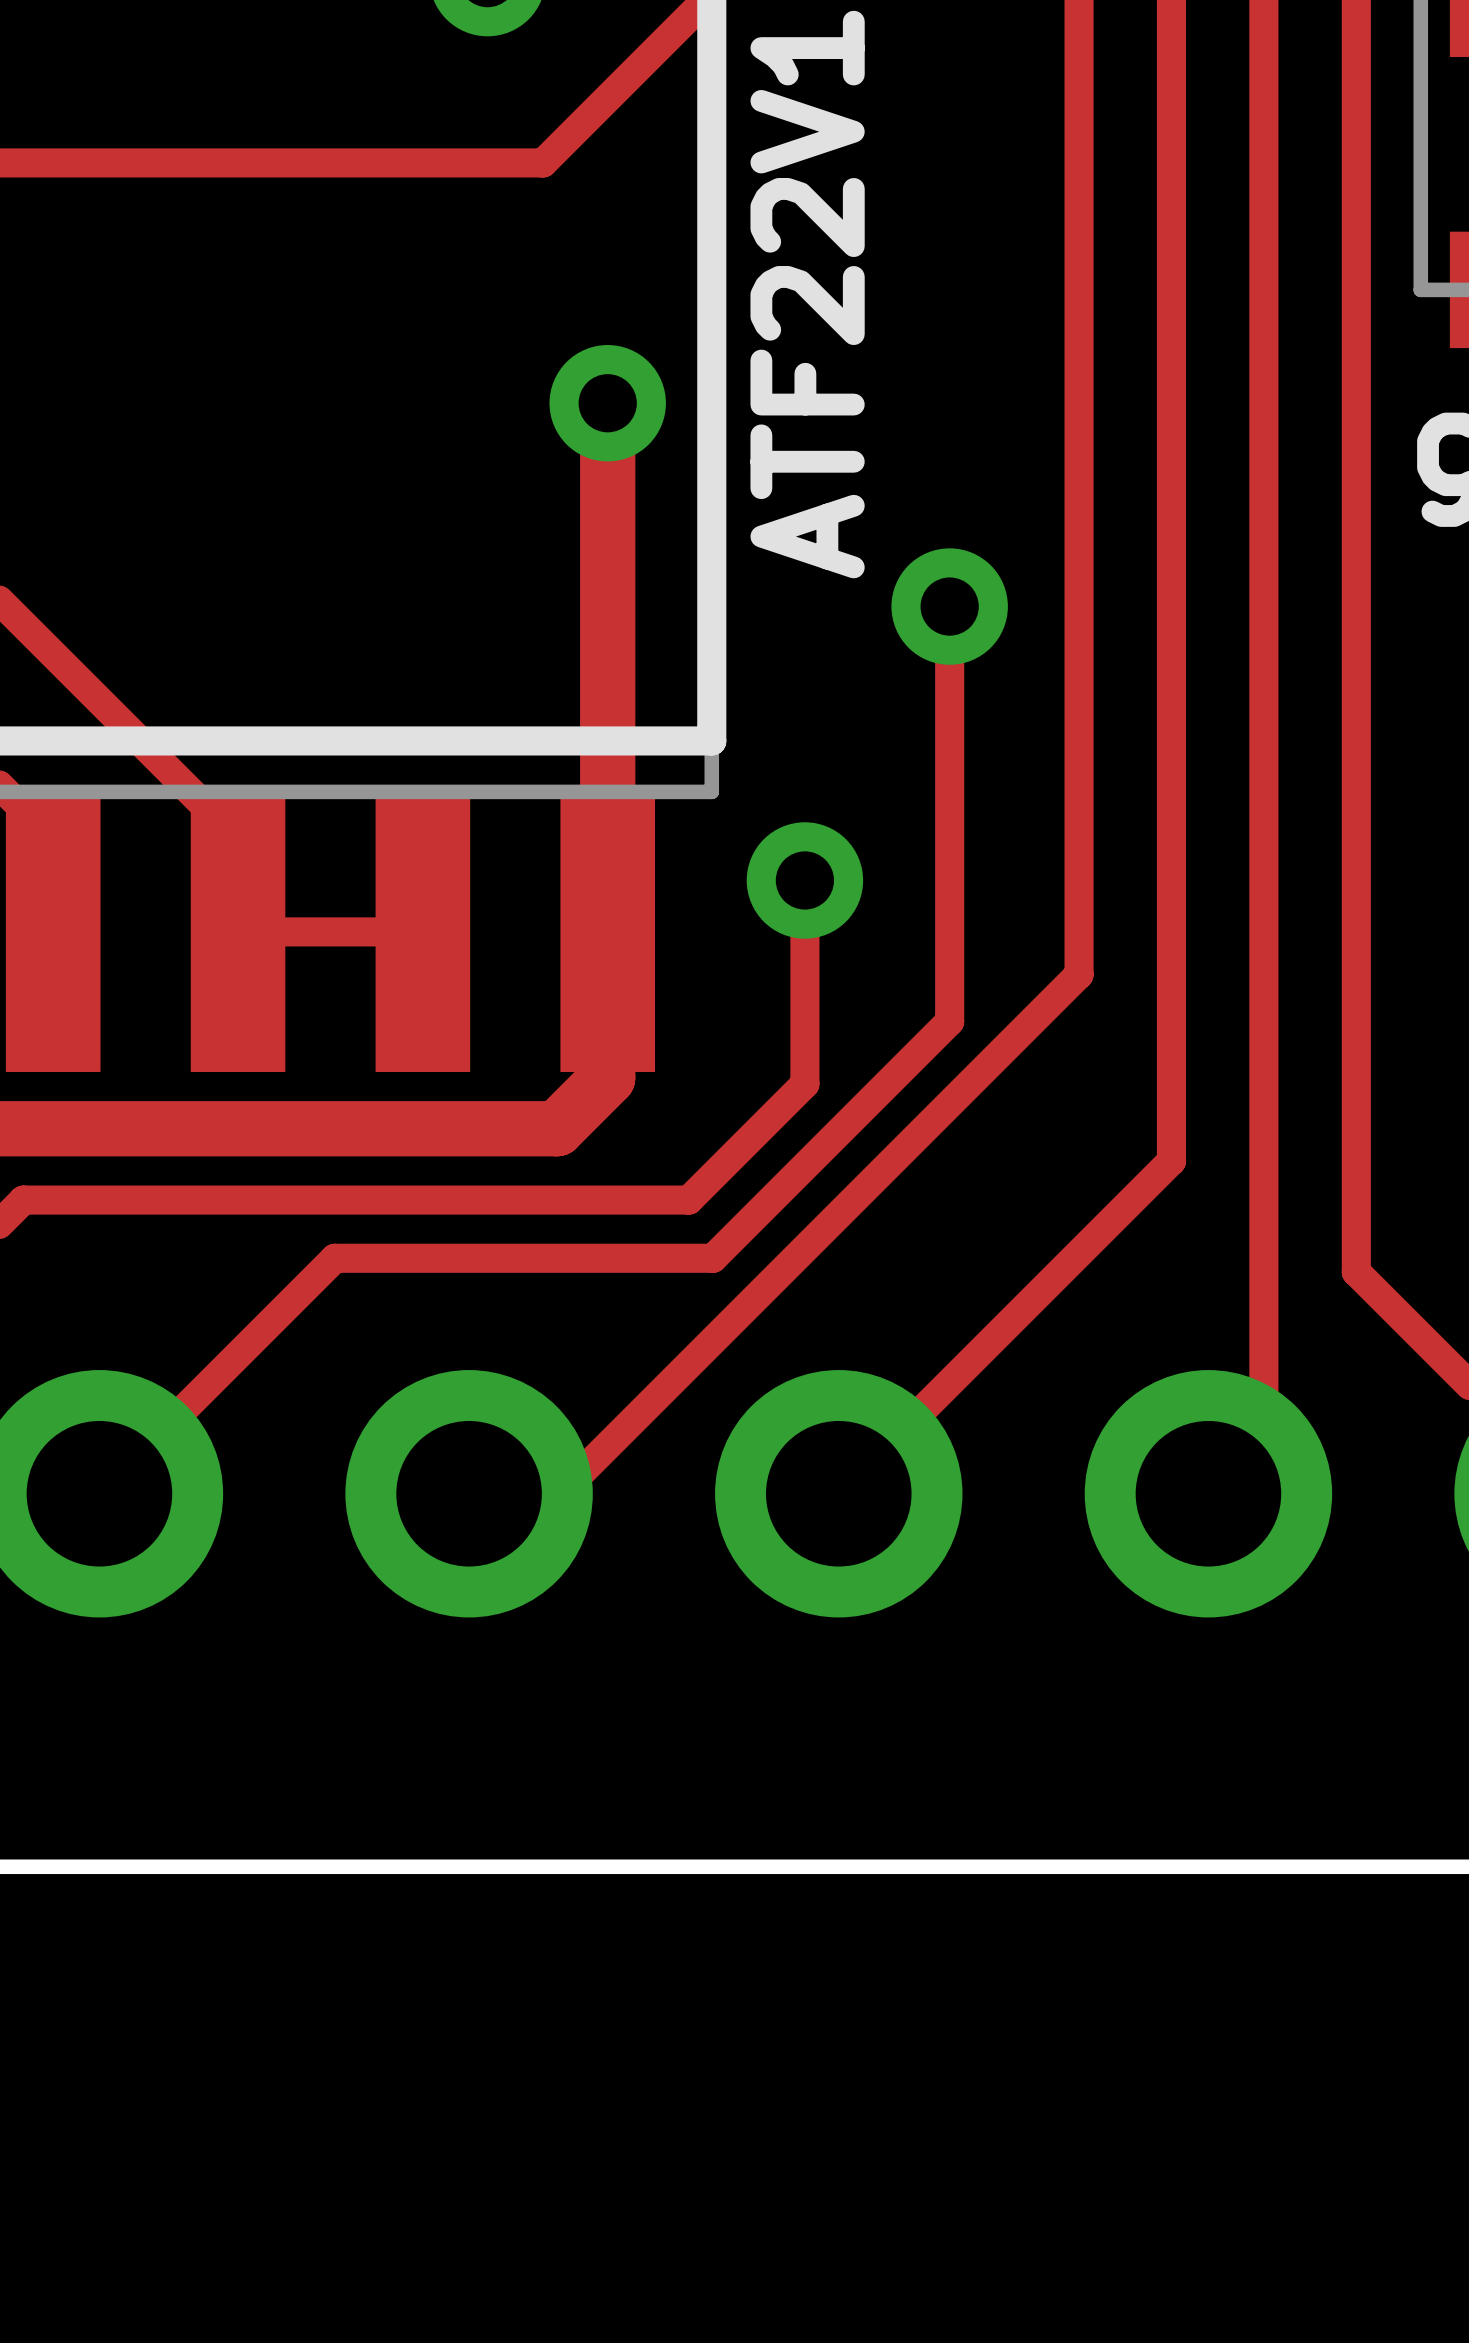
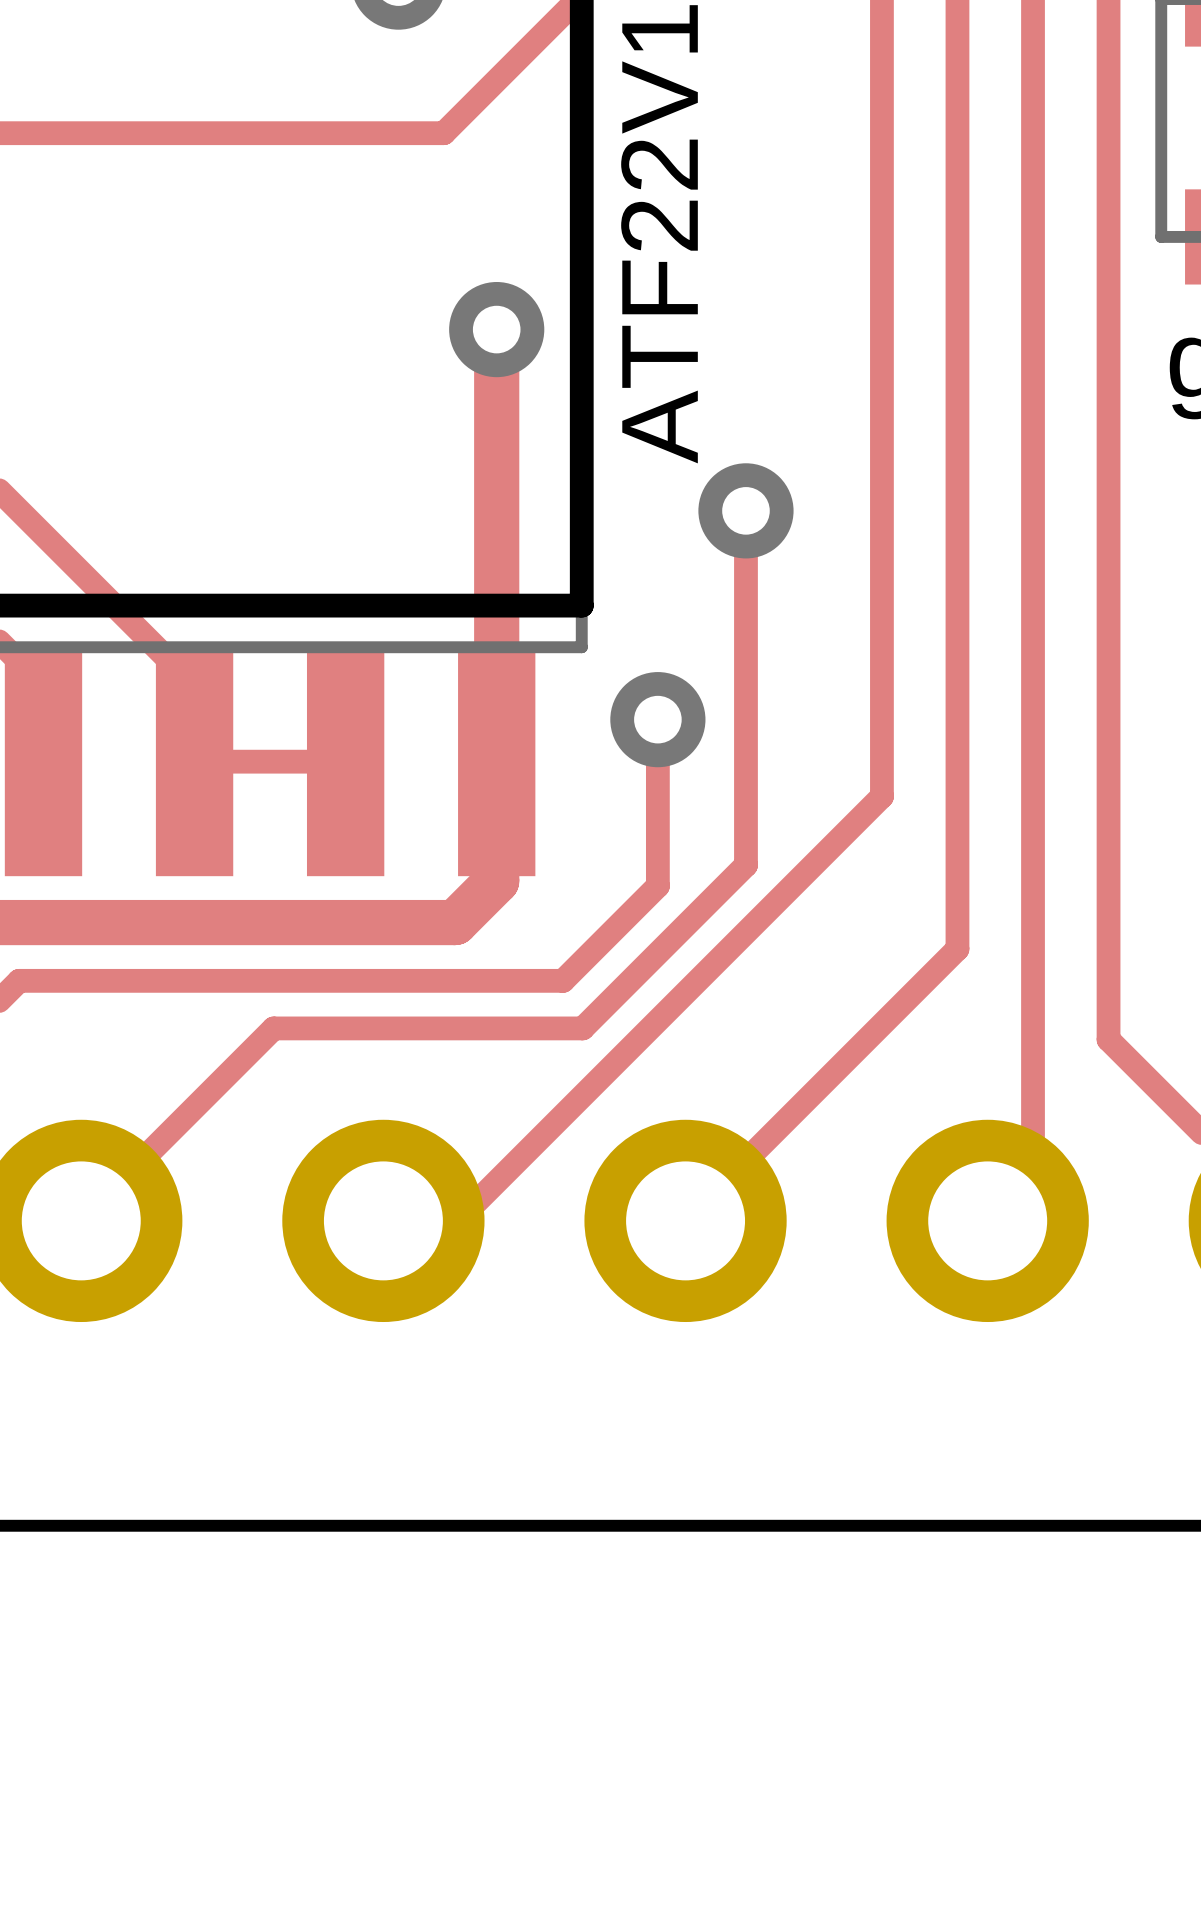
track: (949, 606) (949, 1021) (912, 1058) -> (745, 510) (745, 865)
via position: (949, 606) -> (745, 510)

